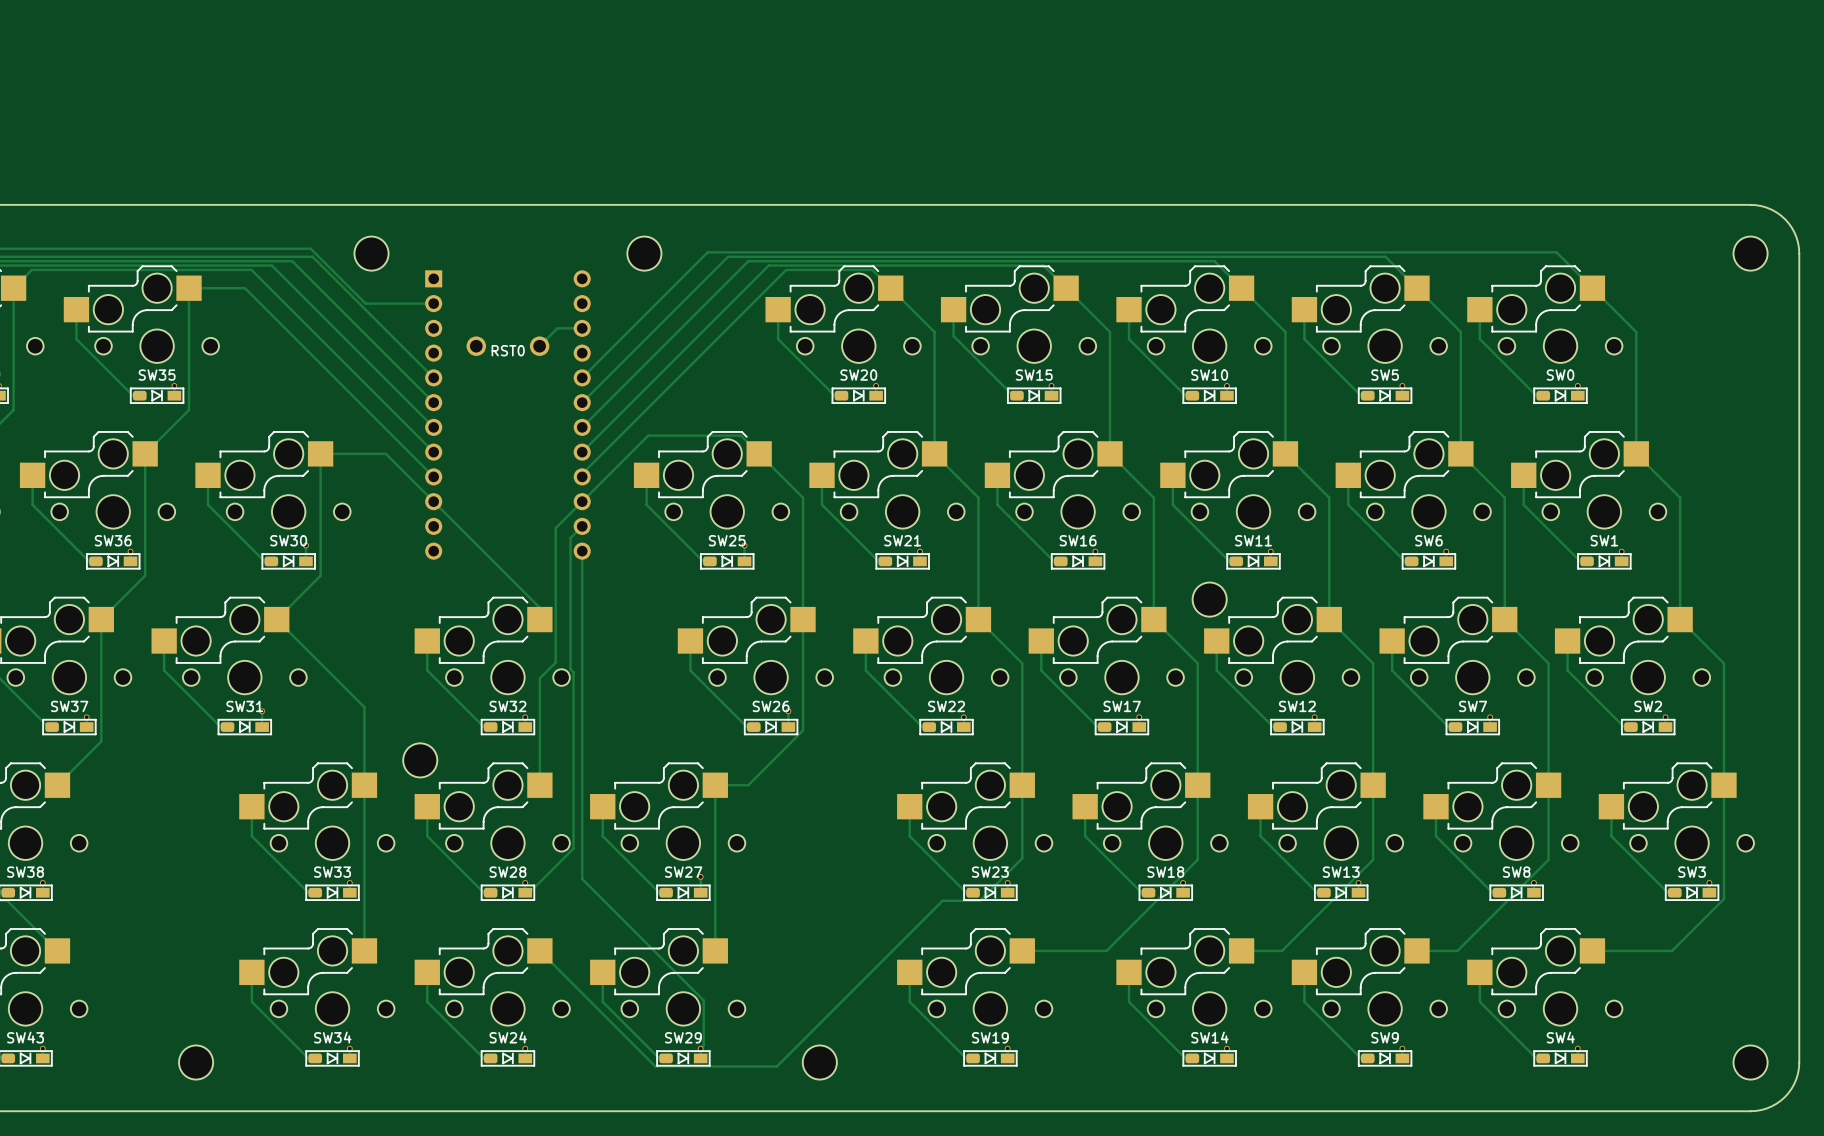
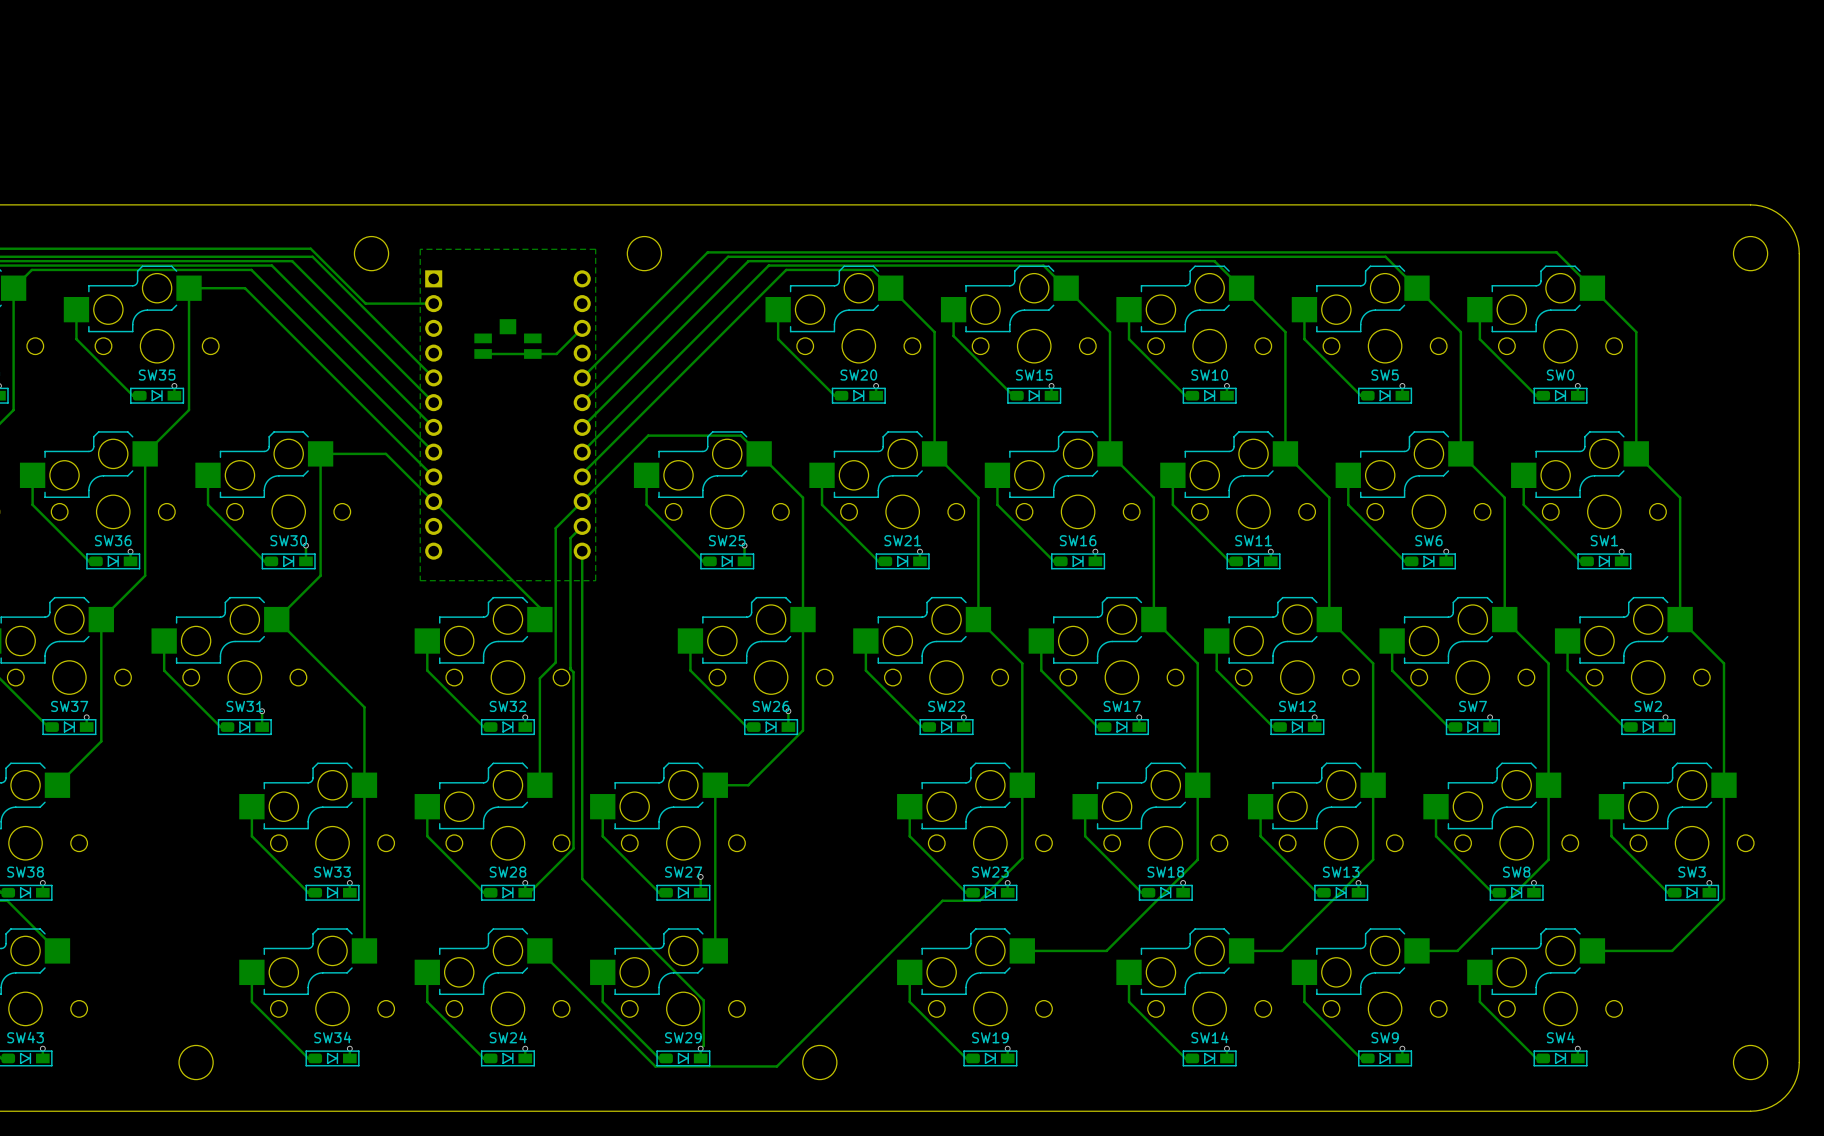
zone outline: none -> (595, 249) (420, 249) (420, 580) (595, 580) (595, 249)
track: (582, 328) (557, 328) (539, 346) -> (582, 328) (556, 353) (483, 353)
part: none -> (507, 339)
RST0: (507, 346) -> none
part: (1209, 599) -> none
part: (420, 760) -> none

